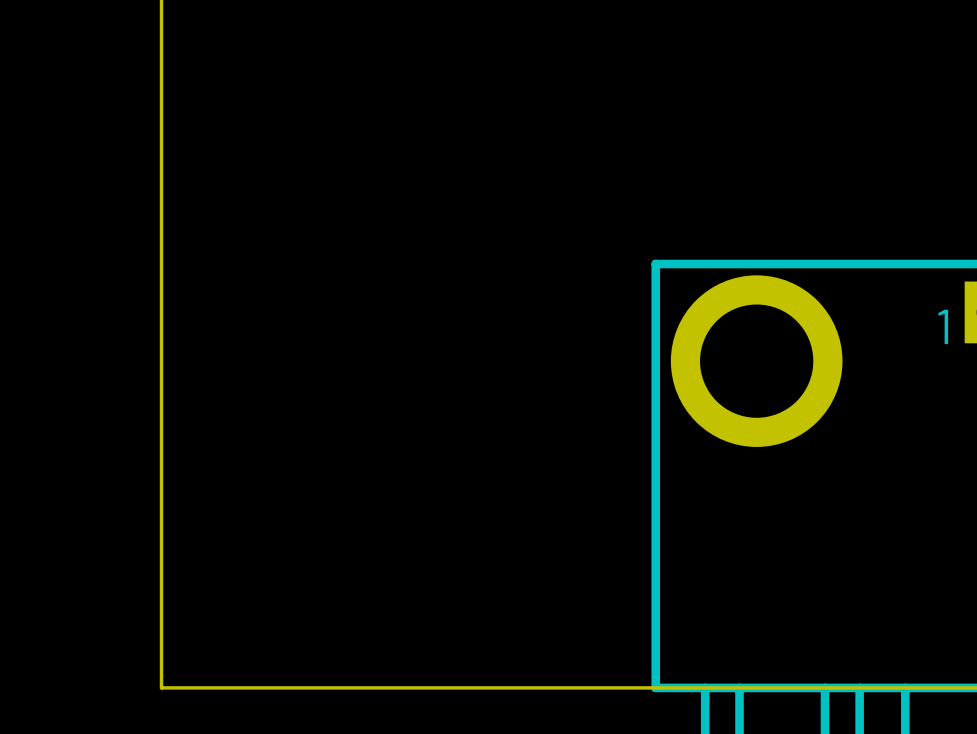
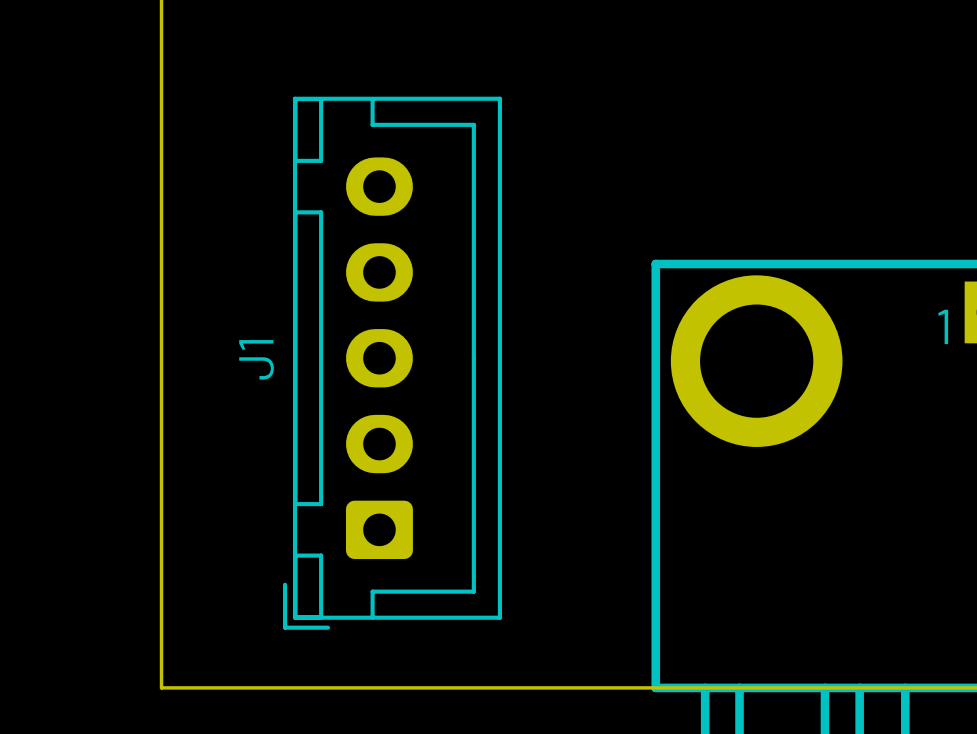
J1: none -> (392, 363)

